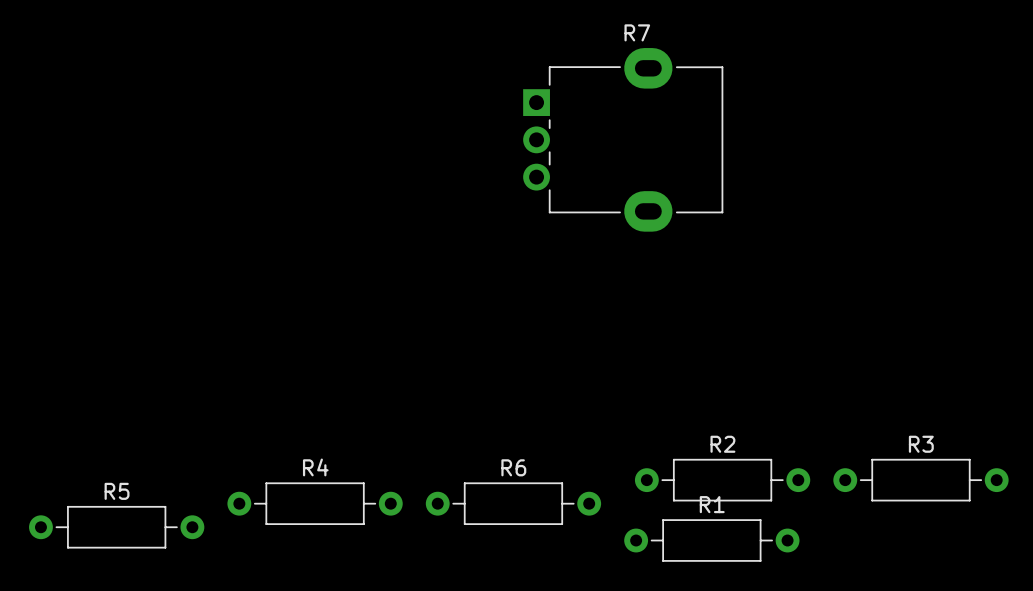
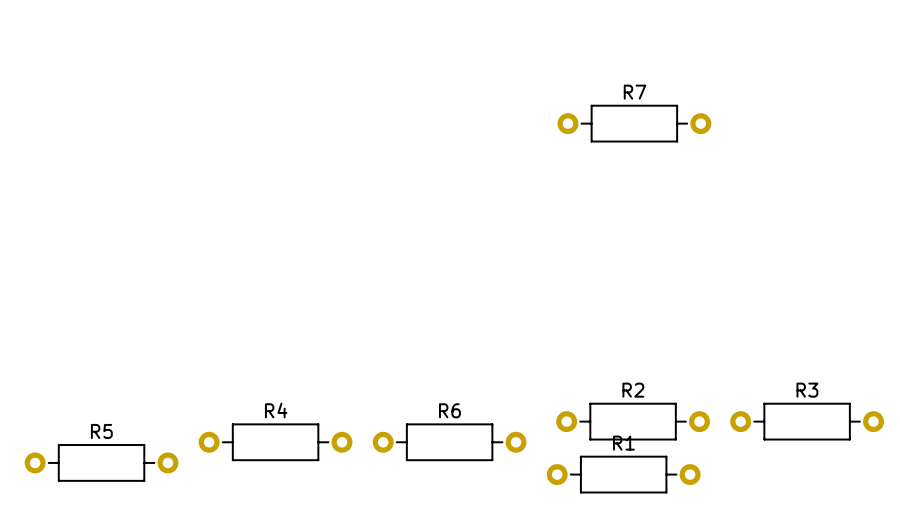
R7 name position: R7 (637, 32) -> R7 (635, 92)
R7 footprint: [523, 48, 724, 232] -> [557, 104, 712, 143]

